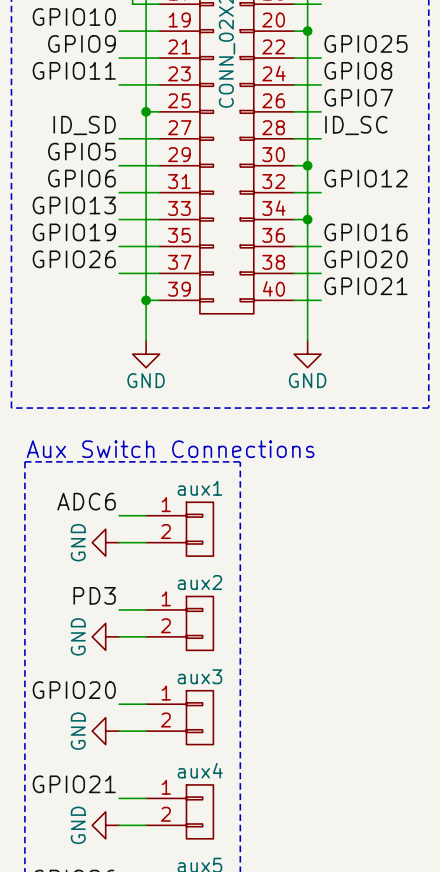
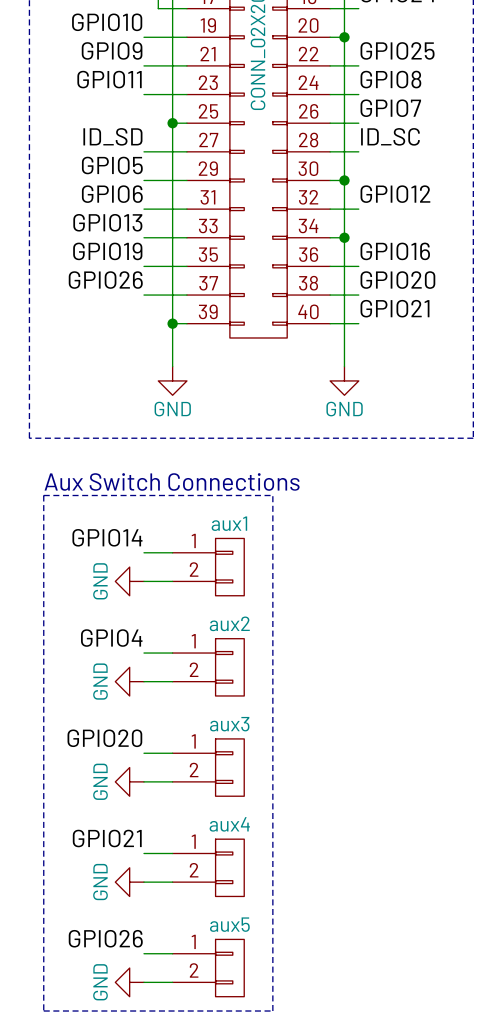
label: ADC6 (86, 501) -> GPIO14 (107, 537)
label: PD3 (94, 595) -> GPIO4 (111, 638)

